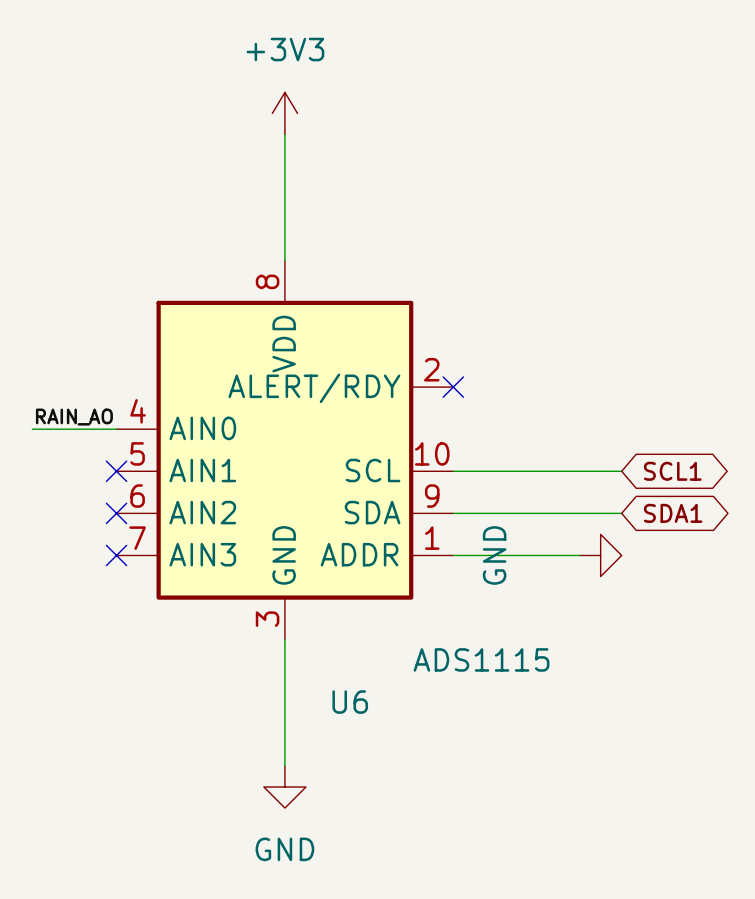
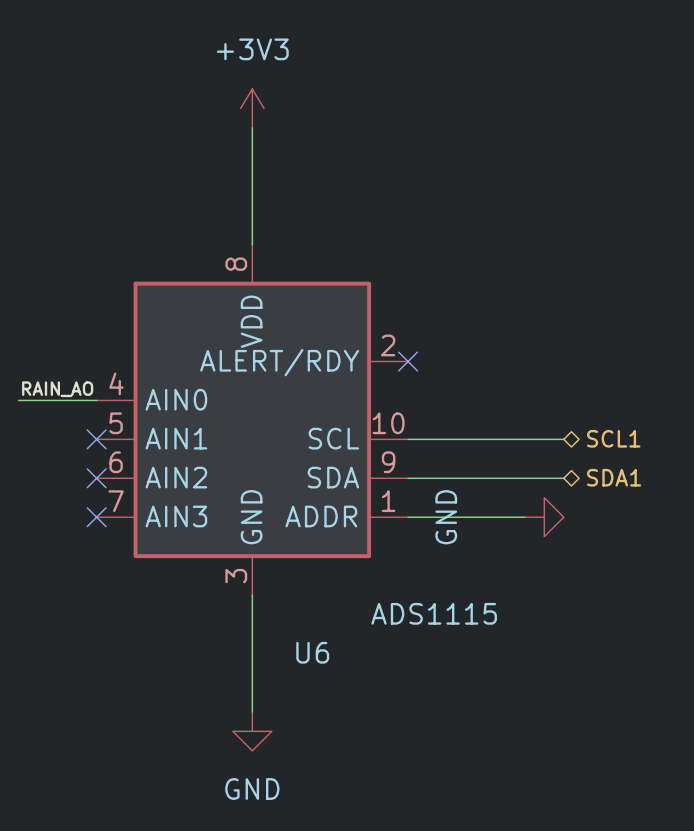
hierarchical label: none -> SCL1 (613, 438)
global label: SCL1 (672, 471) -> none
hierarchical label: none -> SDA1 (614, 477)
global label: SDA1 (673, 513) -> none

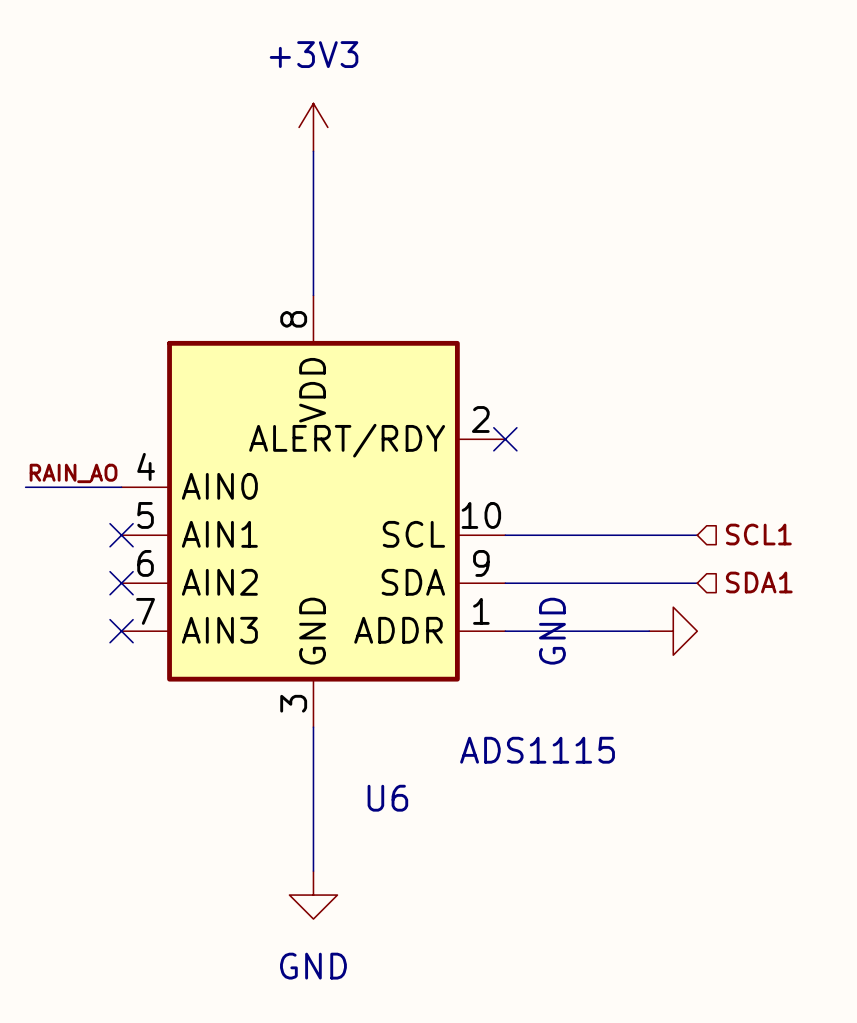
hierarchical label shape: bidirectional (613, 438) -> input (758, 534)
hierarchical label shape: bidirectional (614, 477) -> input (759, 582)

